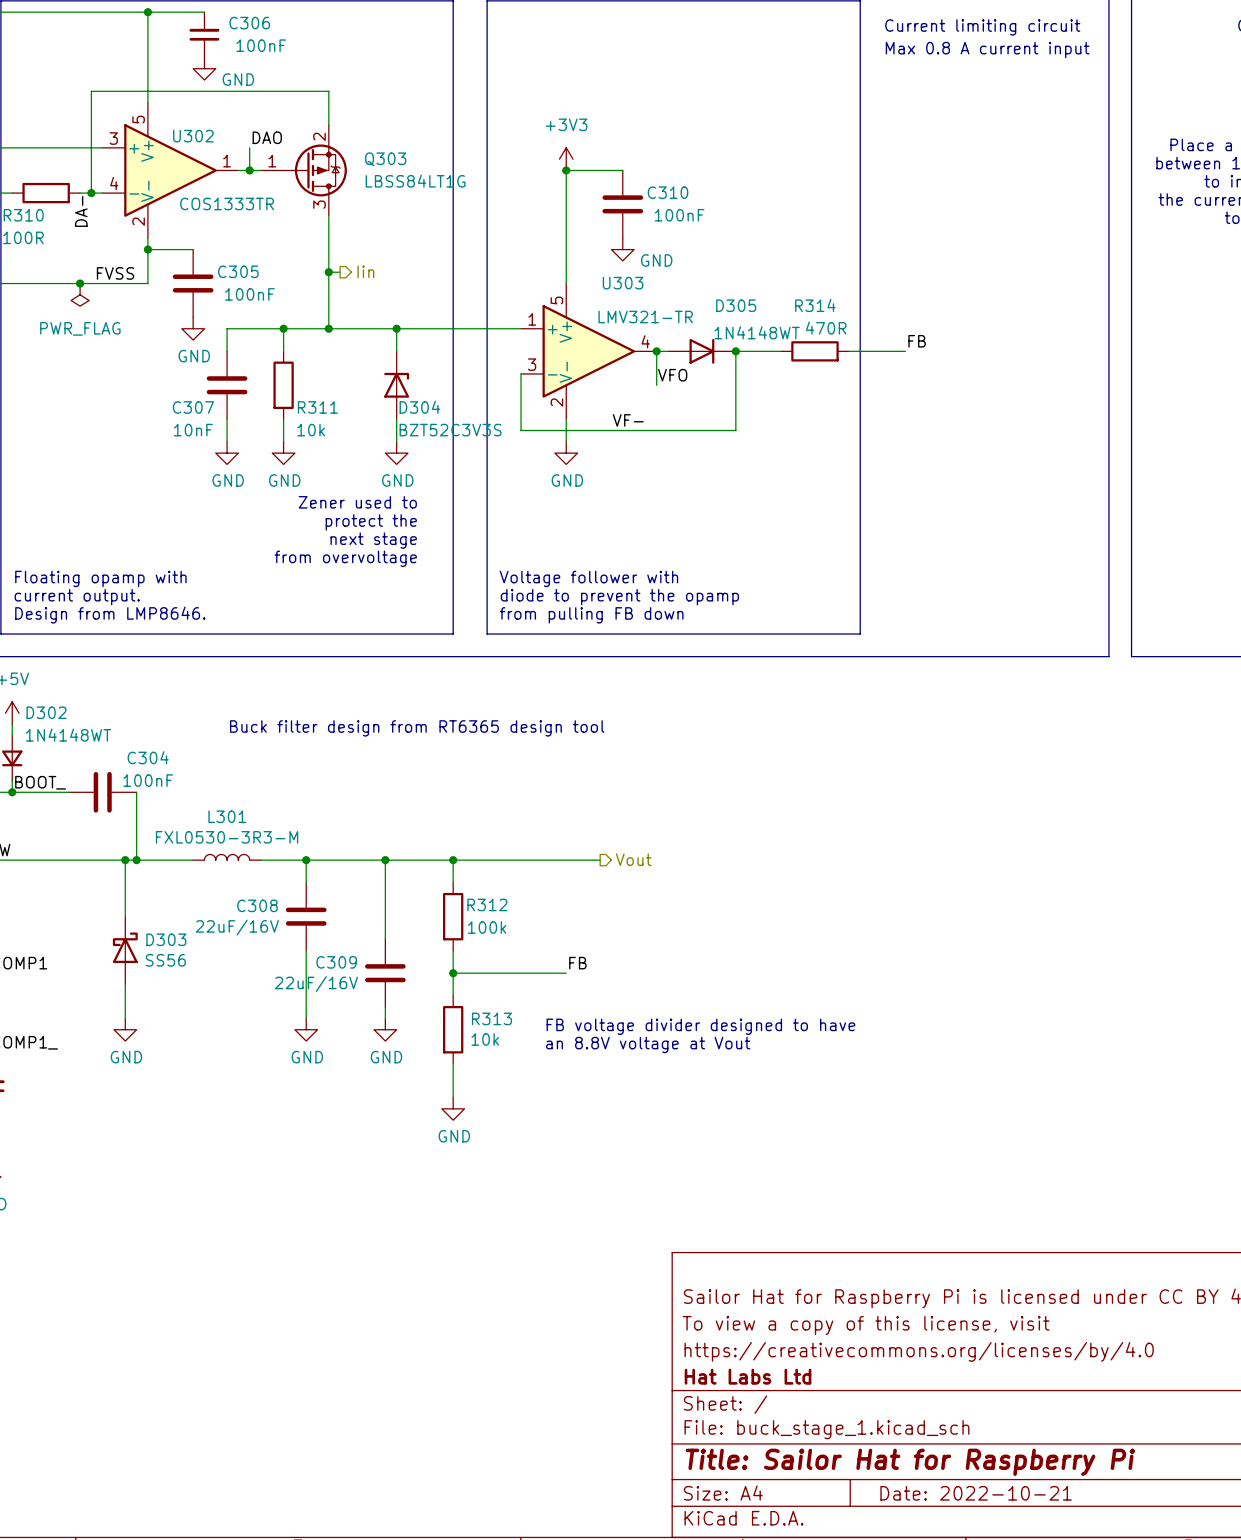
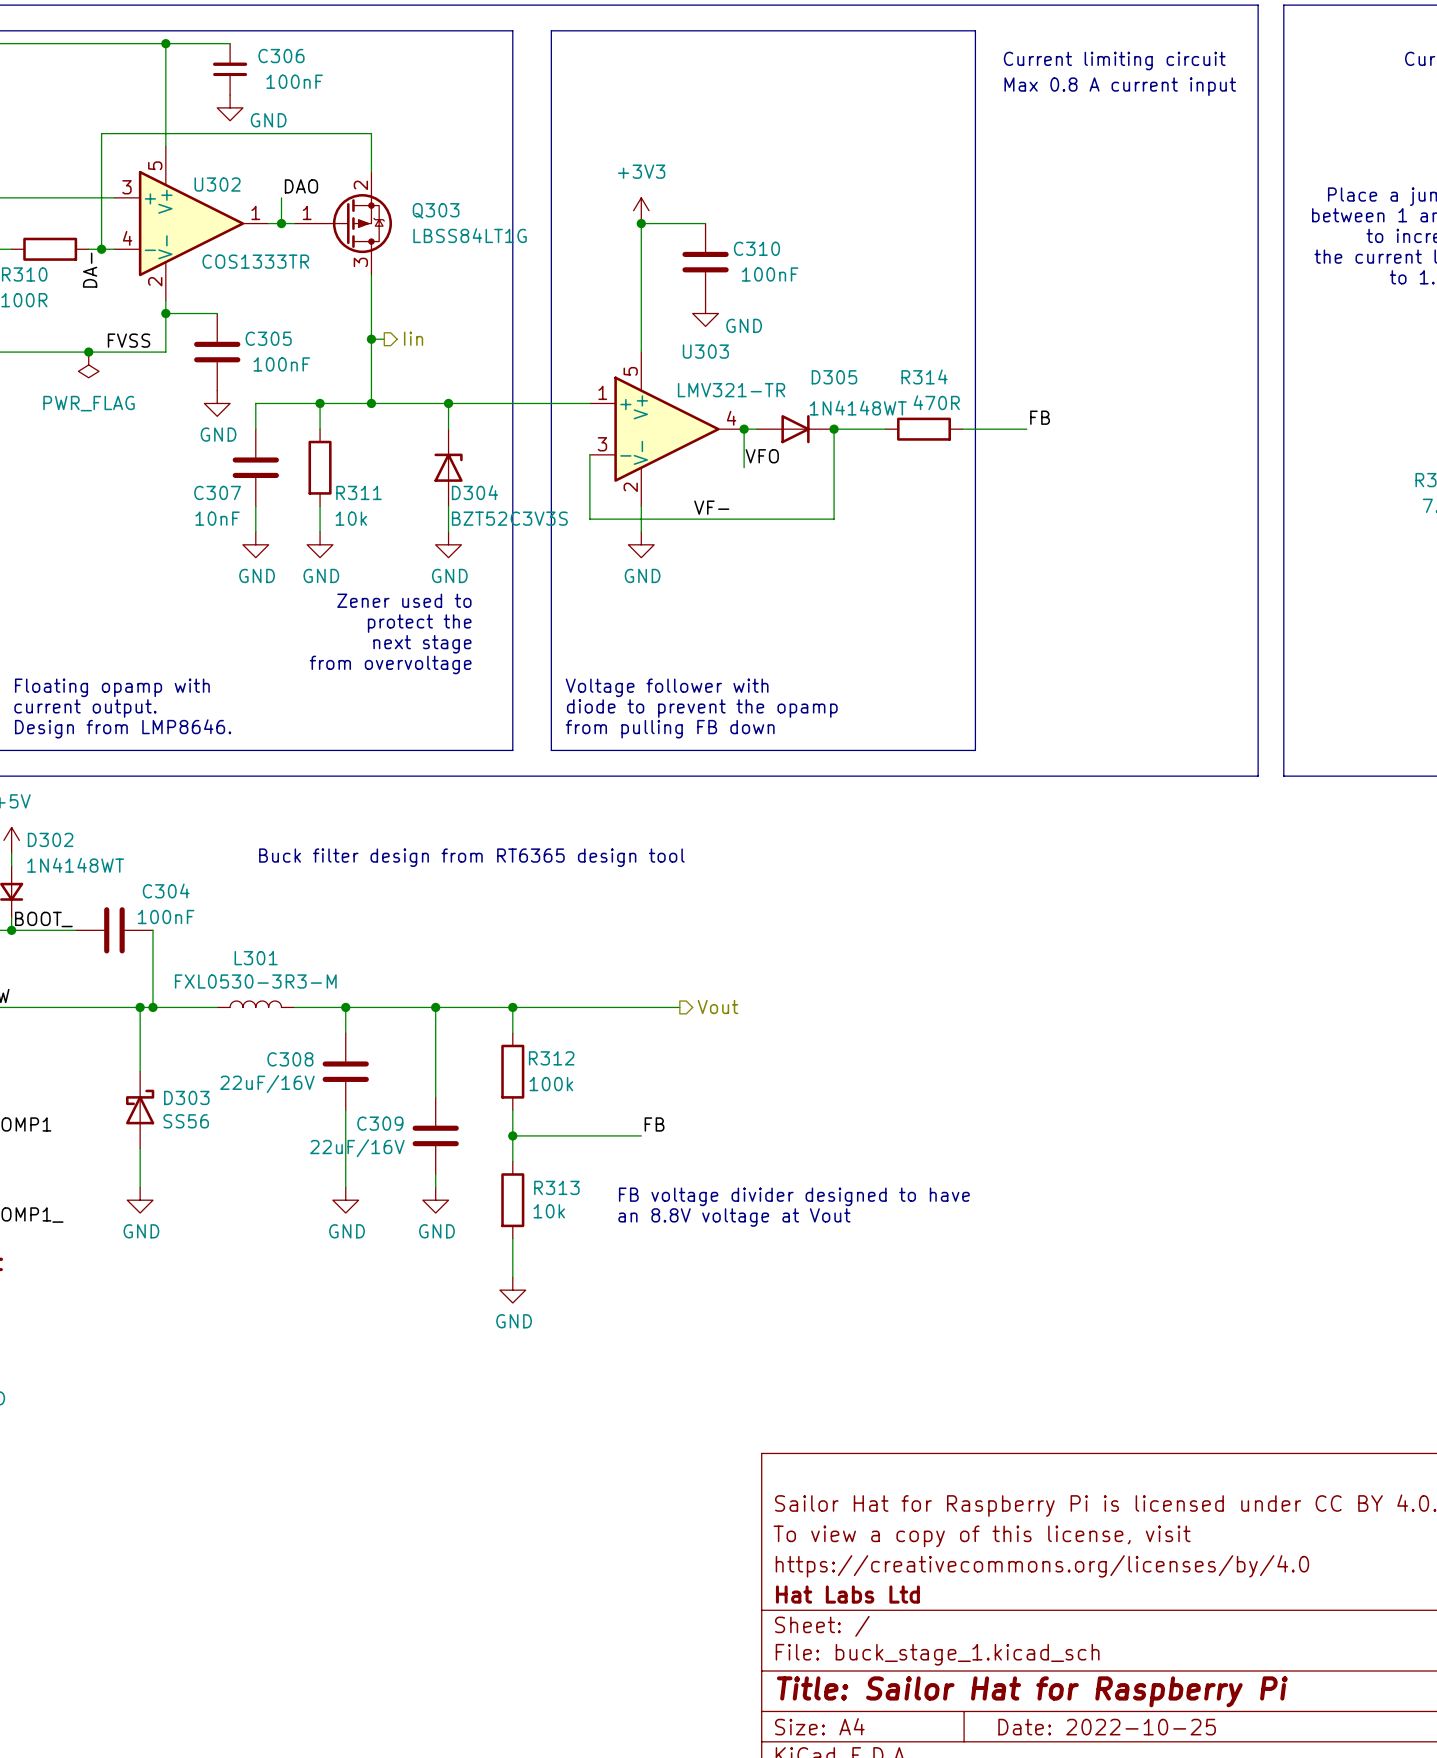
title block: Date: 2022-10-21 (976, 1493) -> Date: 2022-10-25 (1107, 1727)

